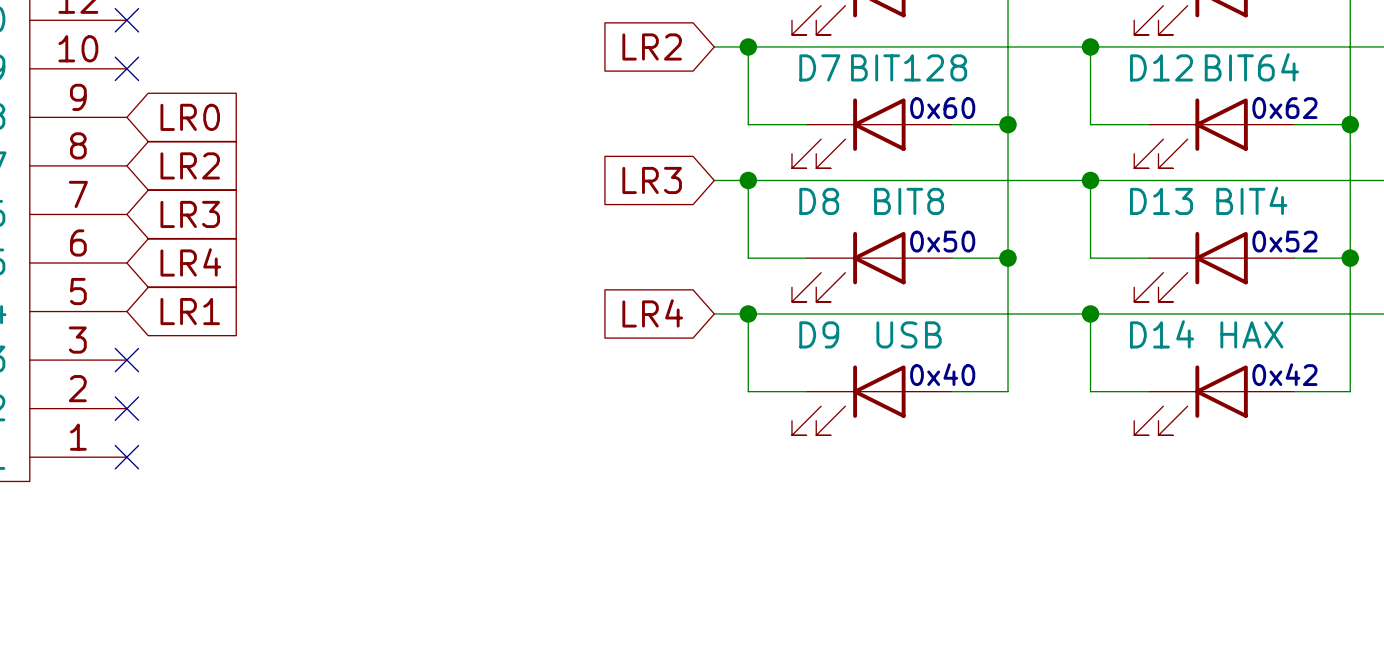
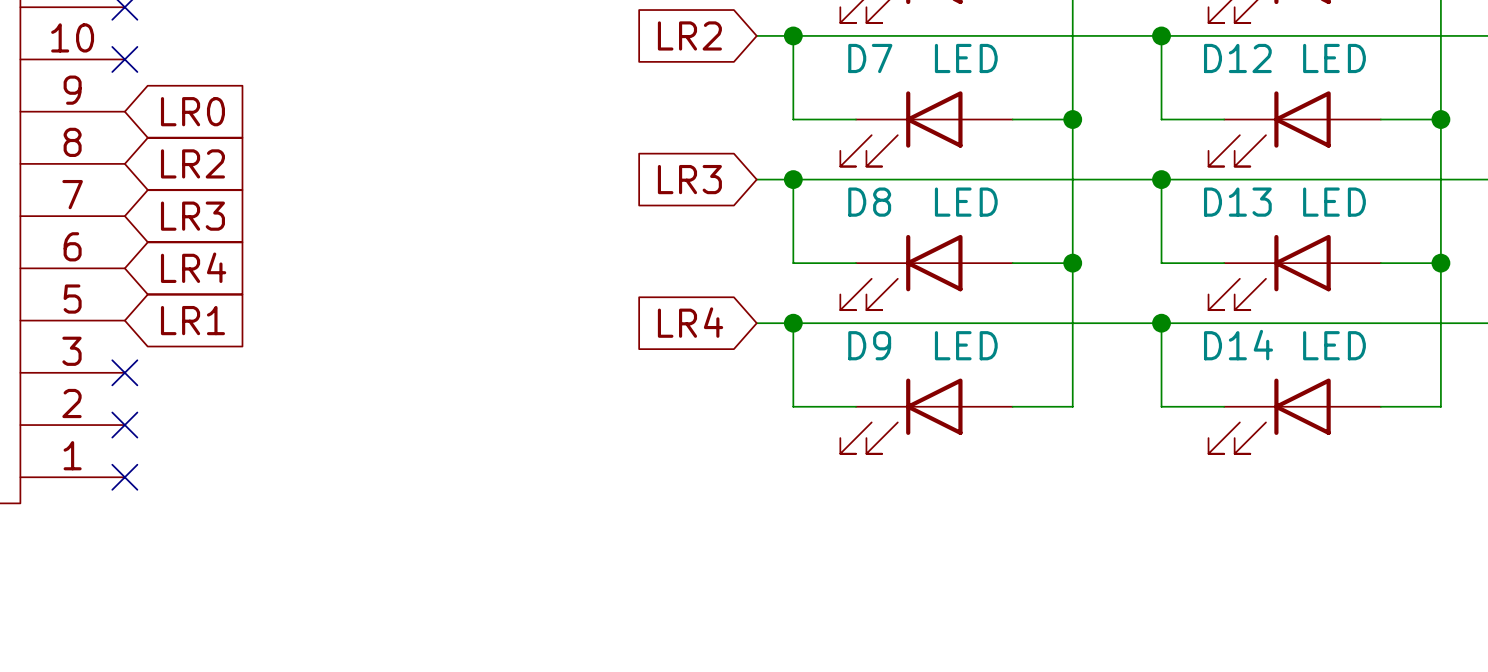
D7 value: BIT128 (909, 67) -> LED (966, 58)
D12 value: BIT64 (1251, 67) -> LED (1334, 58)
text: 0x60 (942, 108) -> none
text: 0x62 (1284, 108) -> none
D13 value: BIT4 (1251, 200) -> LED (1334, 202)
D8 value: BIT8 (909, 201) -> LED (966, 202)
text: 0x50 (942, 241) -> none
text: 0x52 (1284, 241) -> none
D9 value: USB (909, 334) -> LED (966, 345)
D14 value: HAX (1251, 334) -> LED (1334, 345)
text: 0x40 (942, 374) -> none
text: 0x42 (1284, 374) -> none

